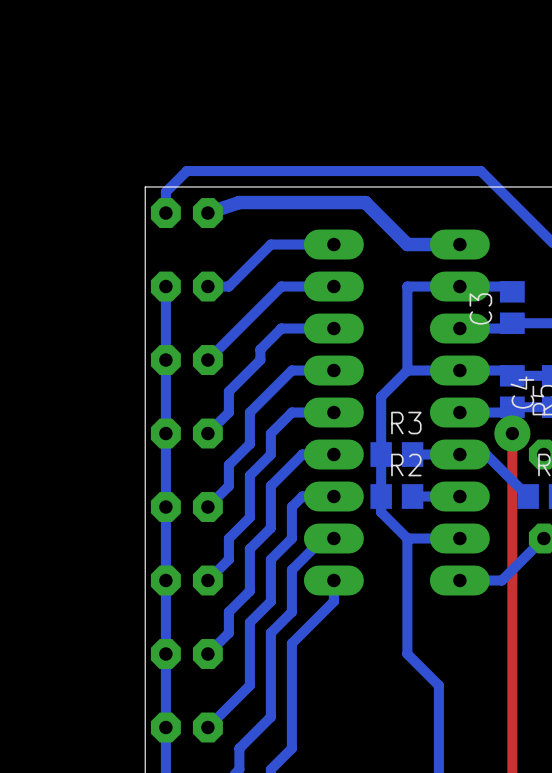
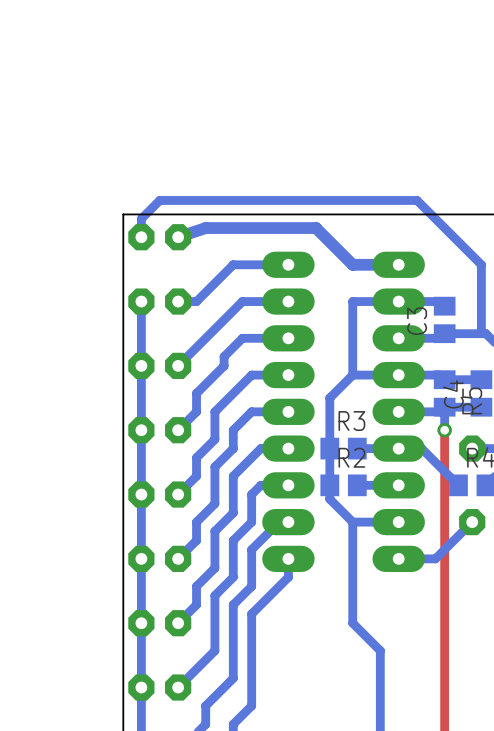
via size: [494, 415, 531, 452] -> [437, 422, 452, 438]

